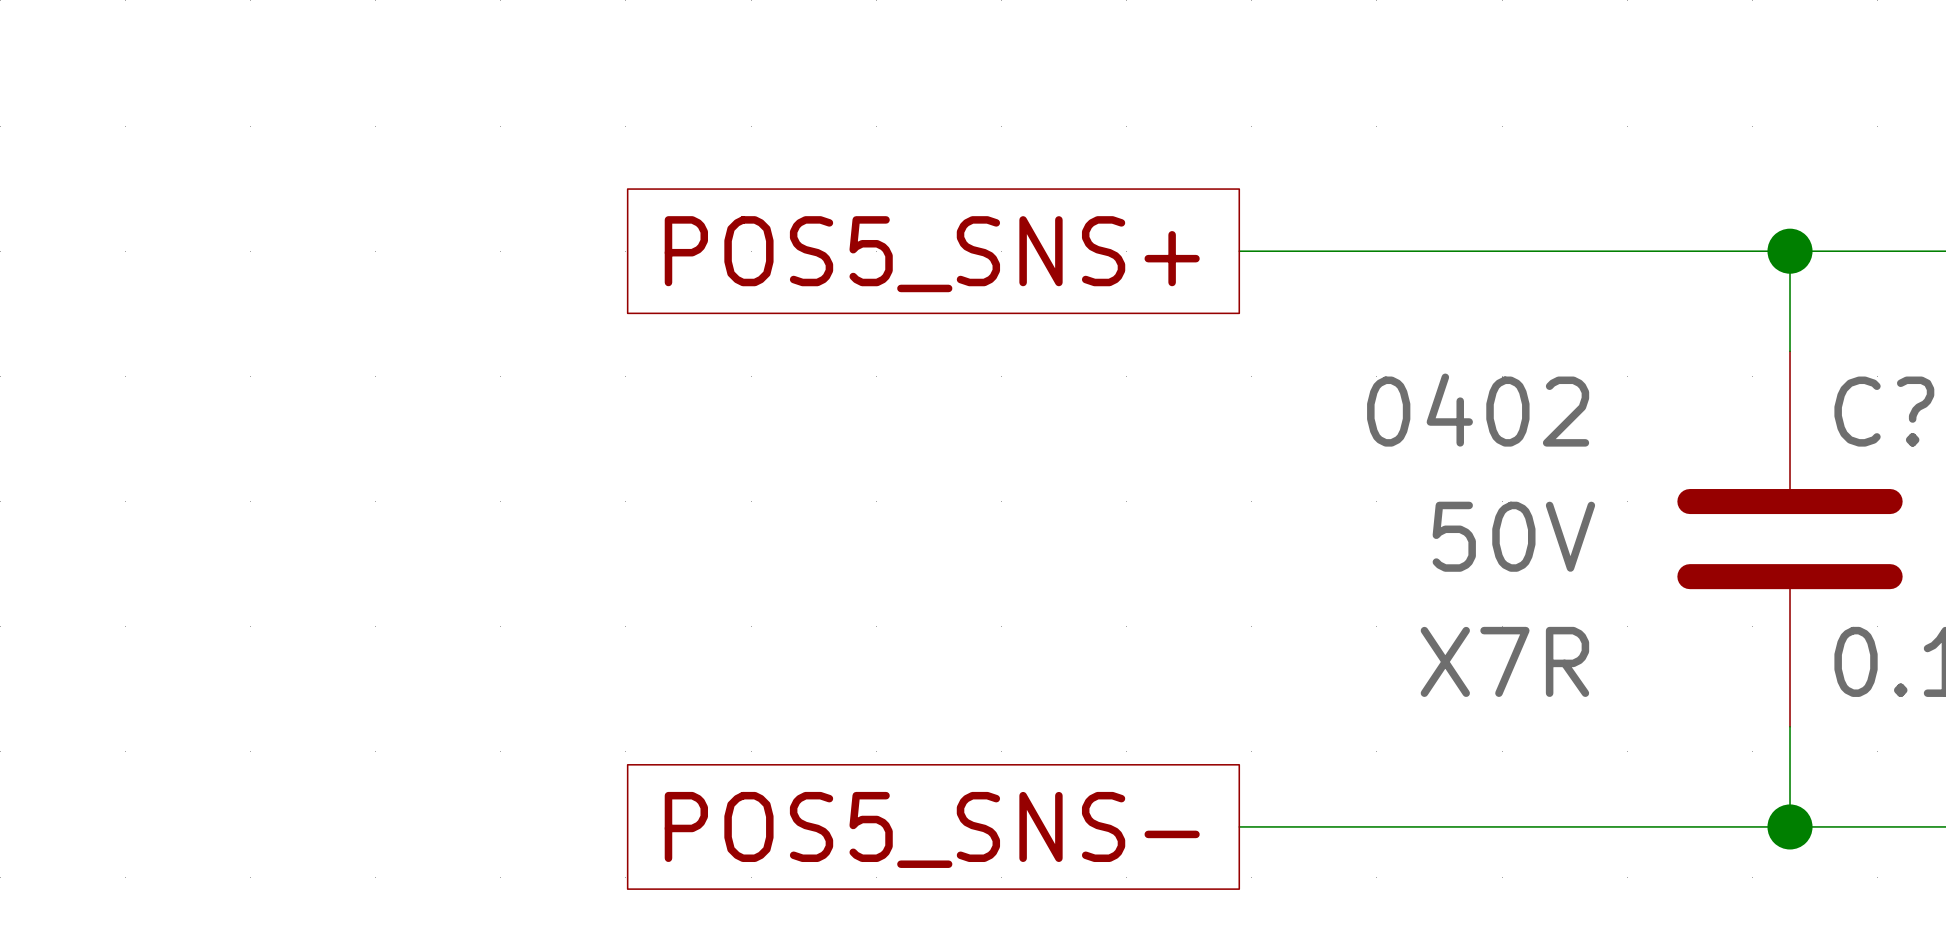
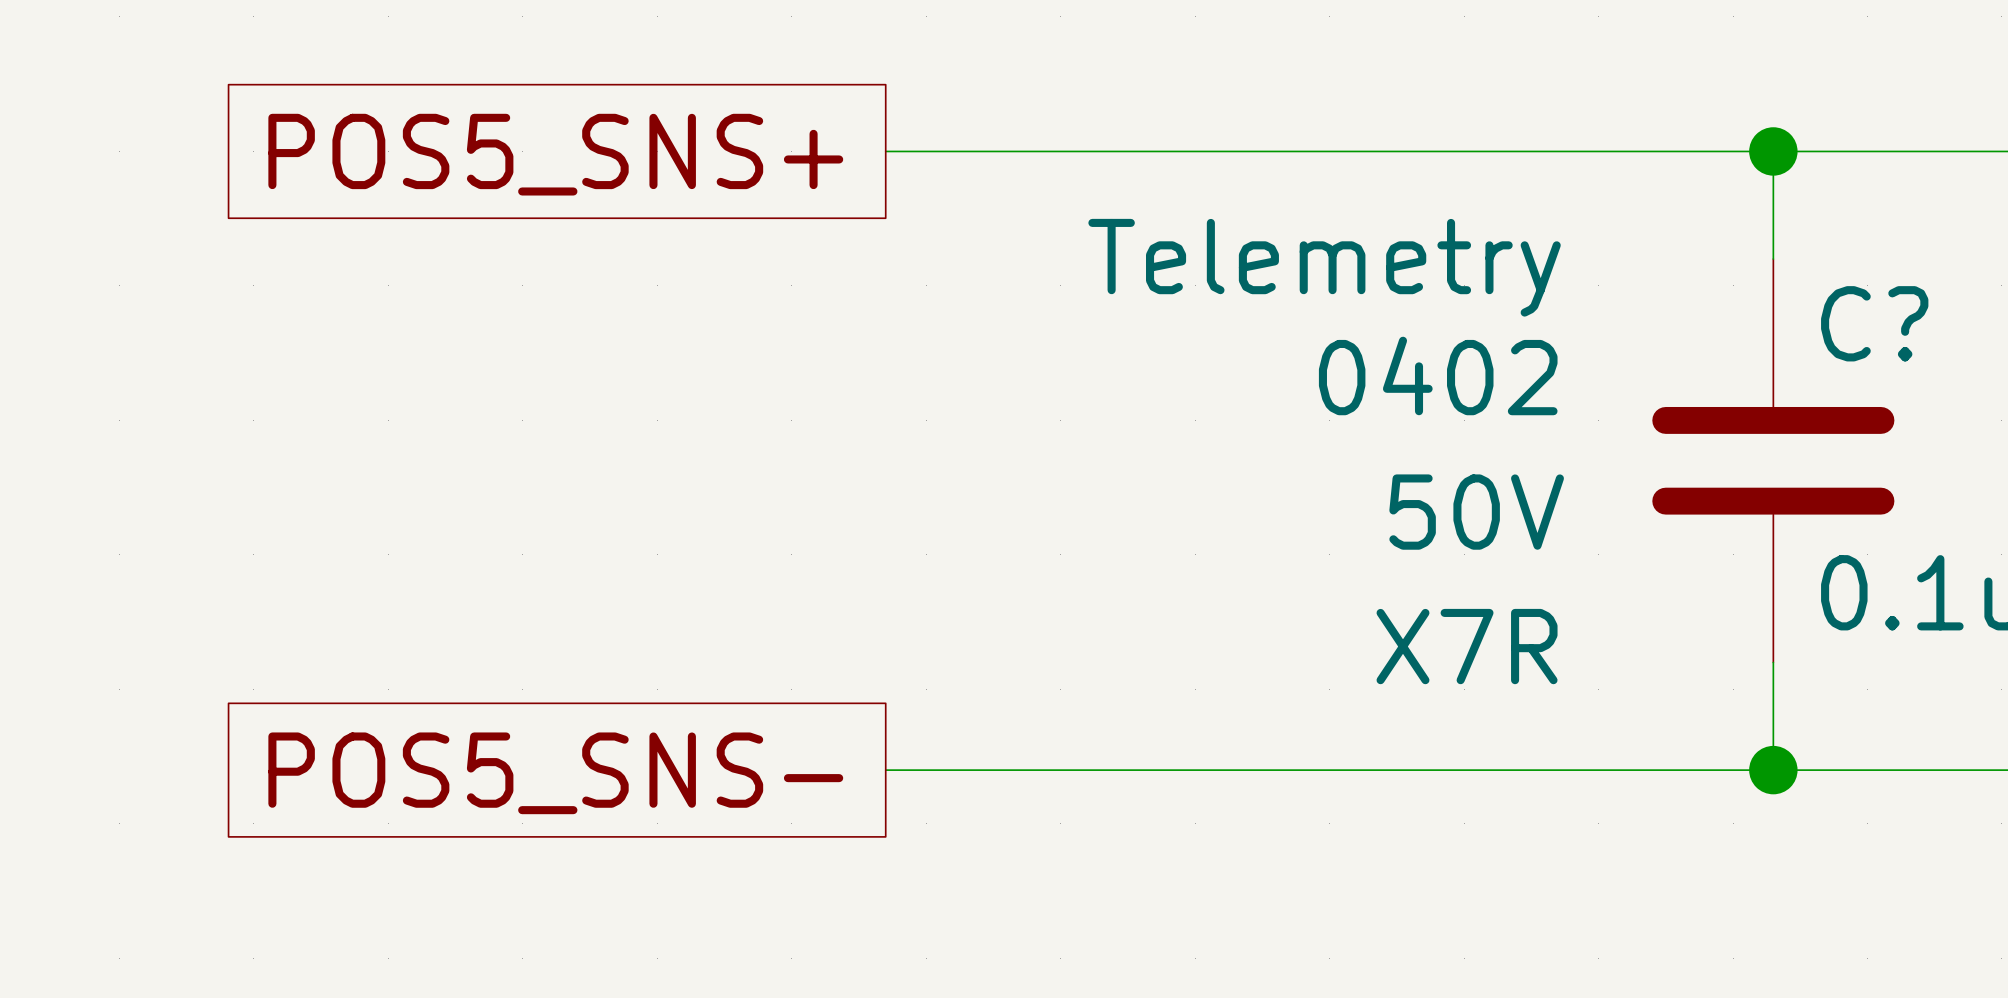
wire: none -> (885, 151) (1181, 151)
global label position: POS5_SNS+ (932, 254) -> POS5_SNS+ (555, 154)
C? text: none -> Telemetry (1324, 267)
C? text position: 0402 (1478, 410) -> 0402 (1438, 375)
C? text position: 50V (1513, 536) -> 50V (1476, 512)
C? text position: X7R (1504, 661) -> X7R (1467, 646)
wire: none -> (885, 770) (1181, 770)
global label position: POS5_SNS- (932, 829) -> POS5_SNS- (555, 773)

